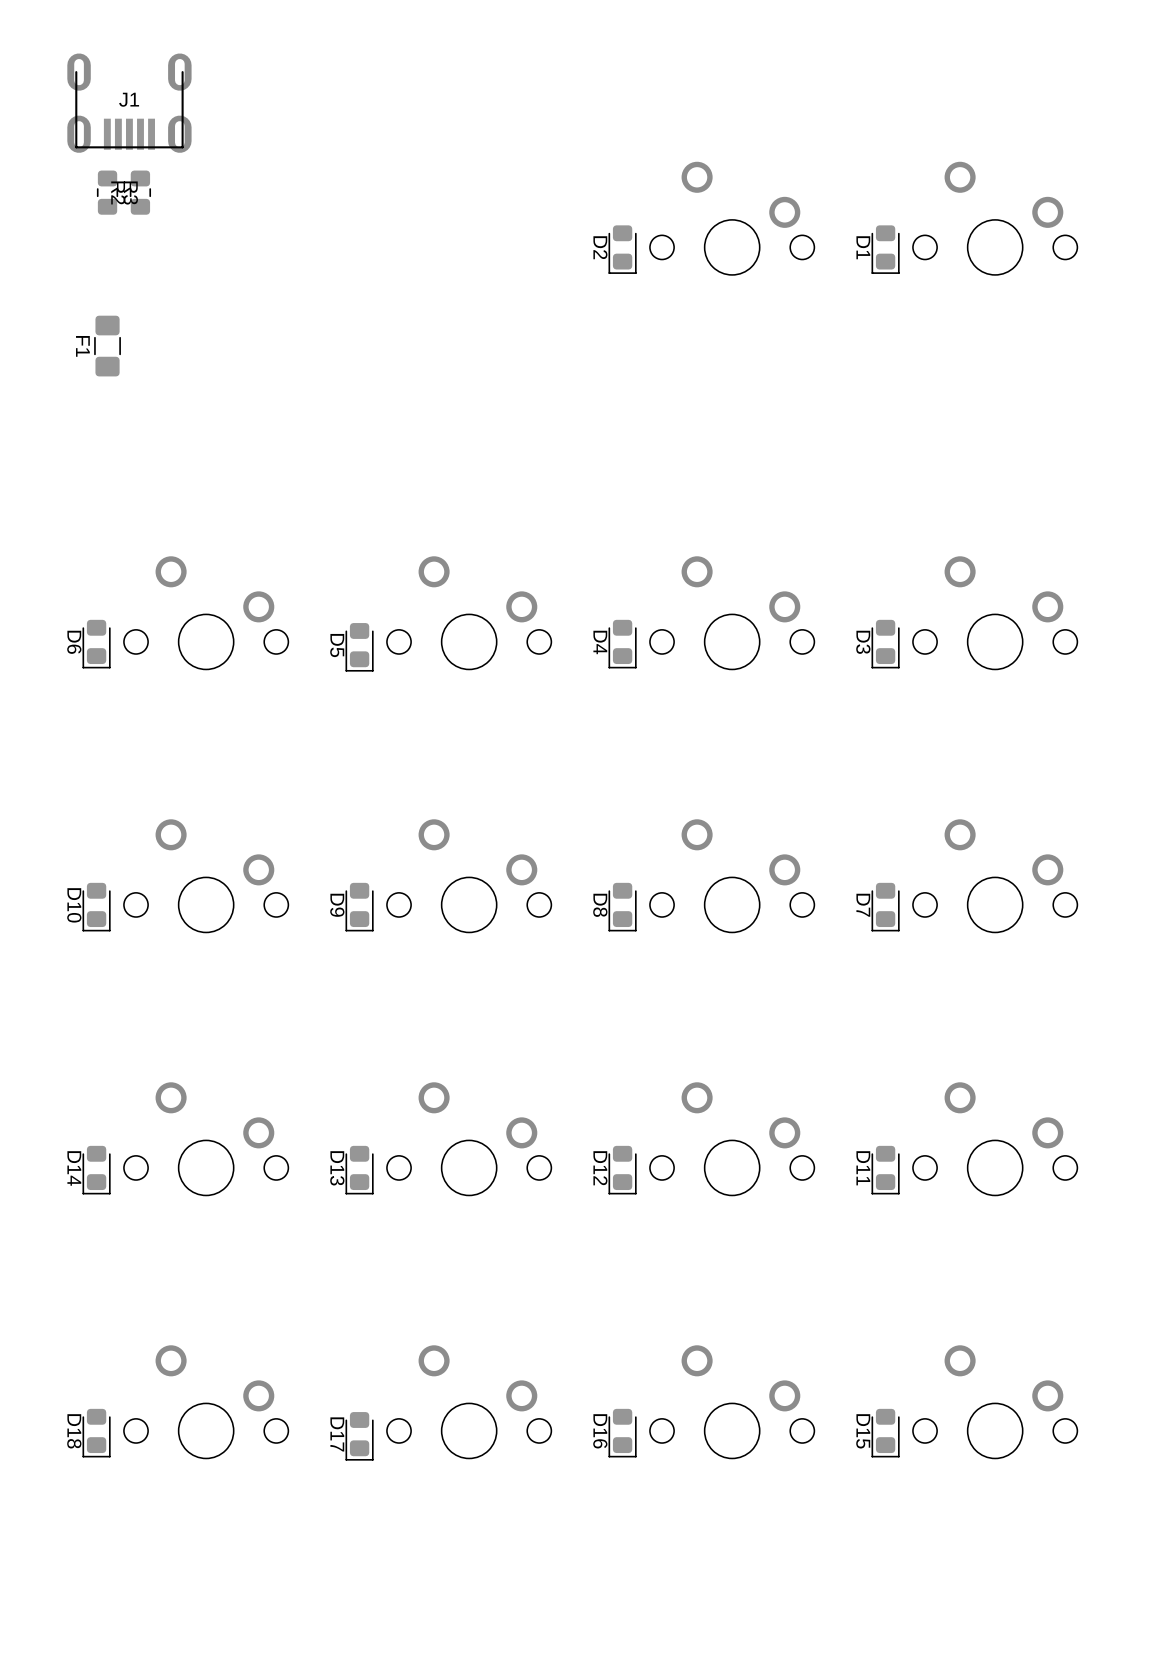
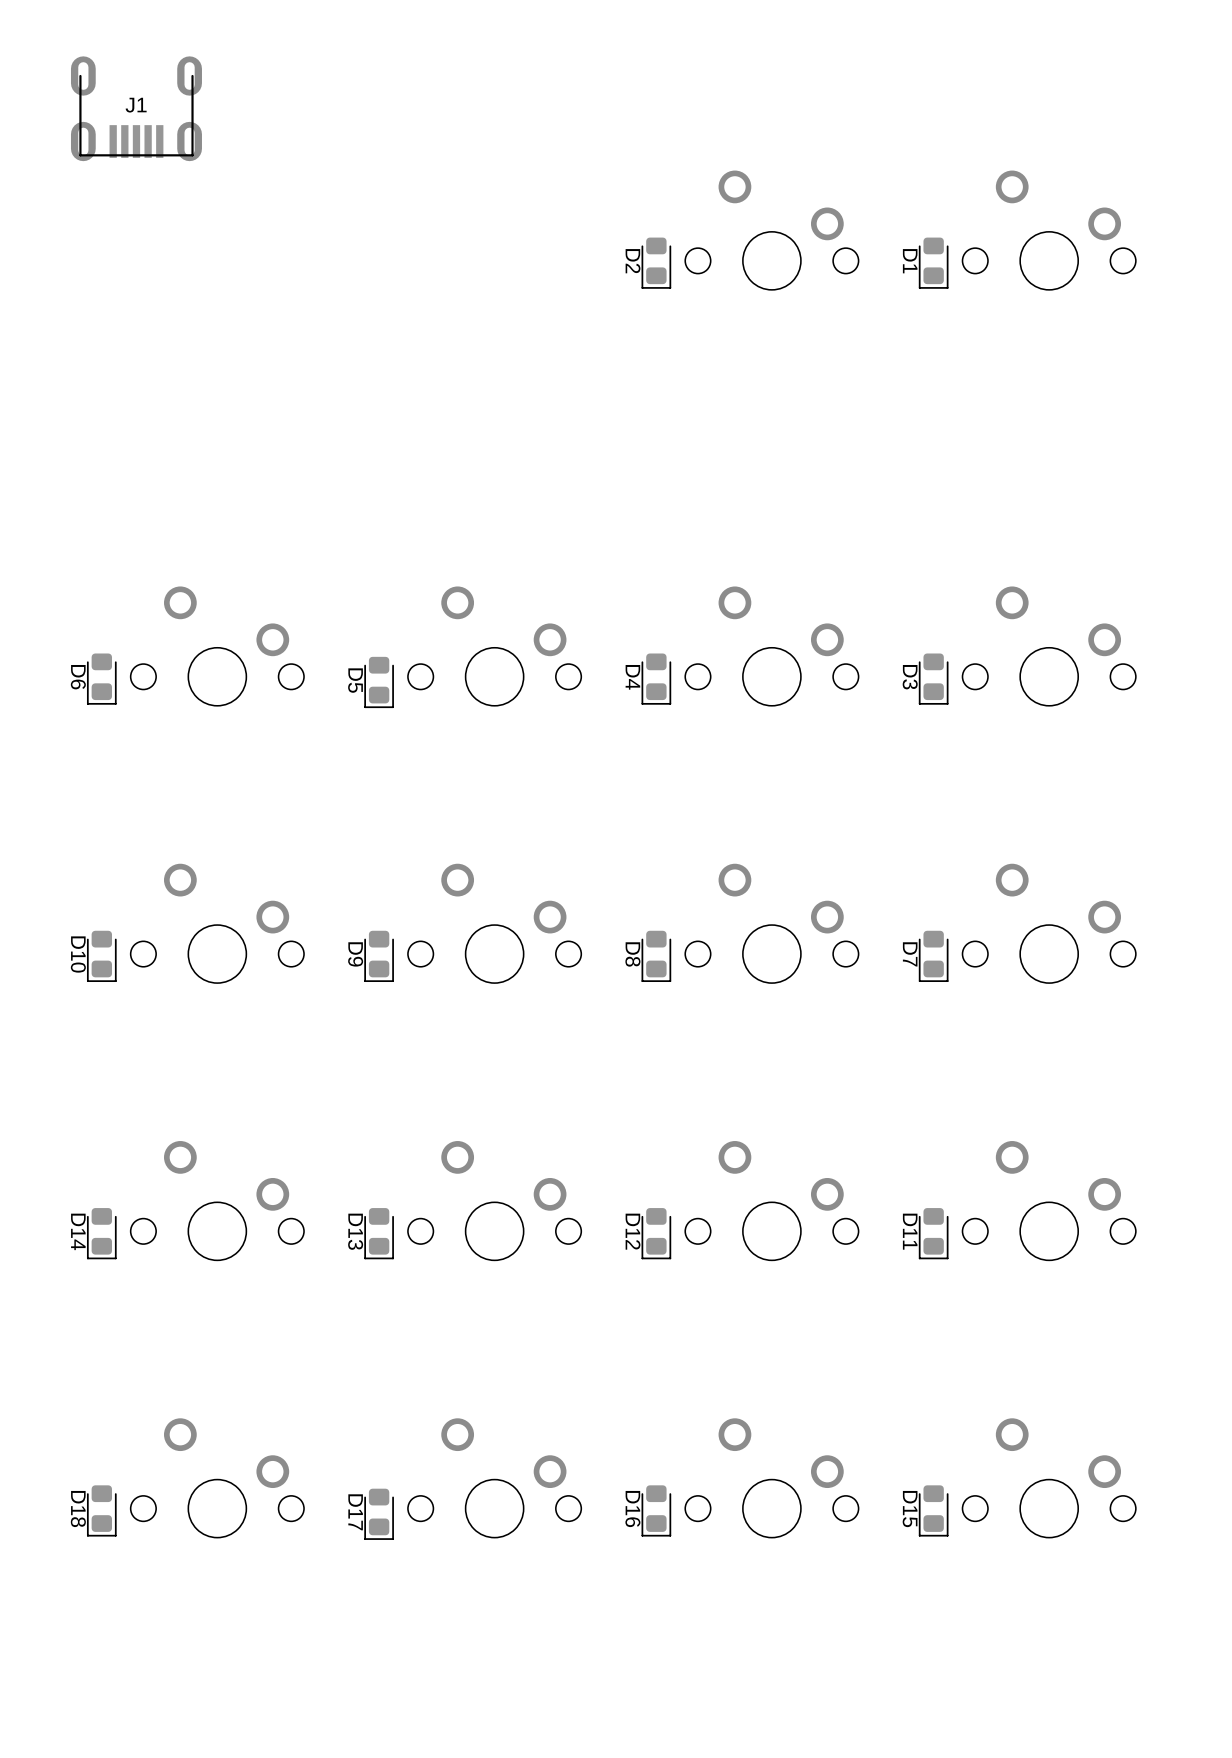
R3: (107, 192) -> none
R2: (140, 192) -> none
F1: (107, 346) -> none

